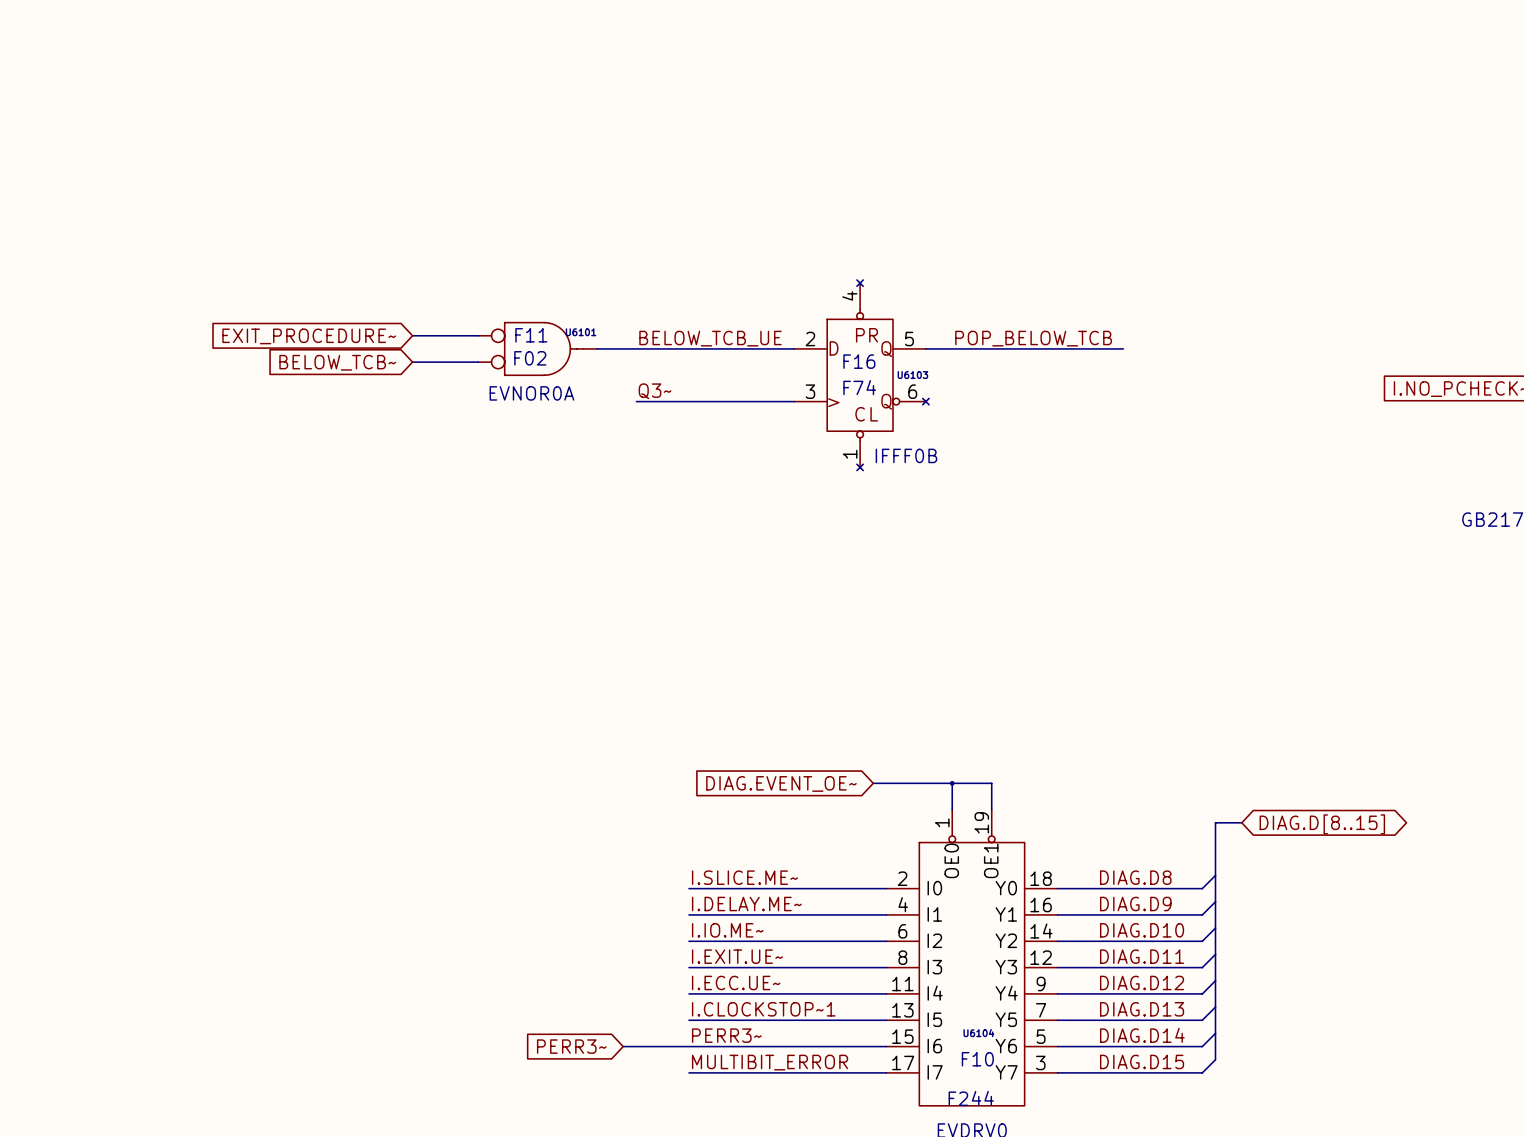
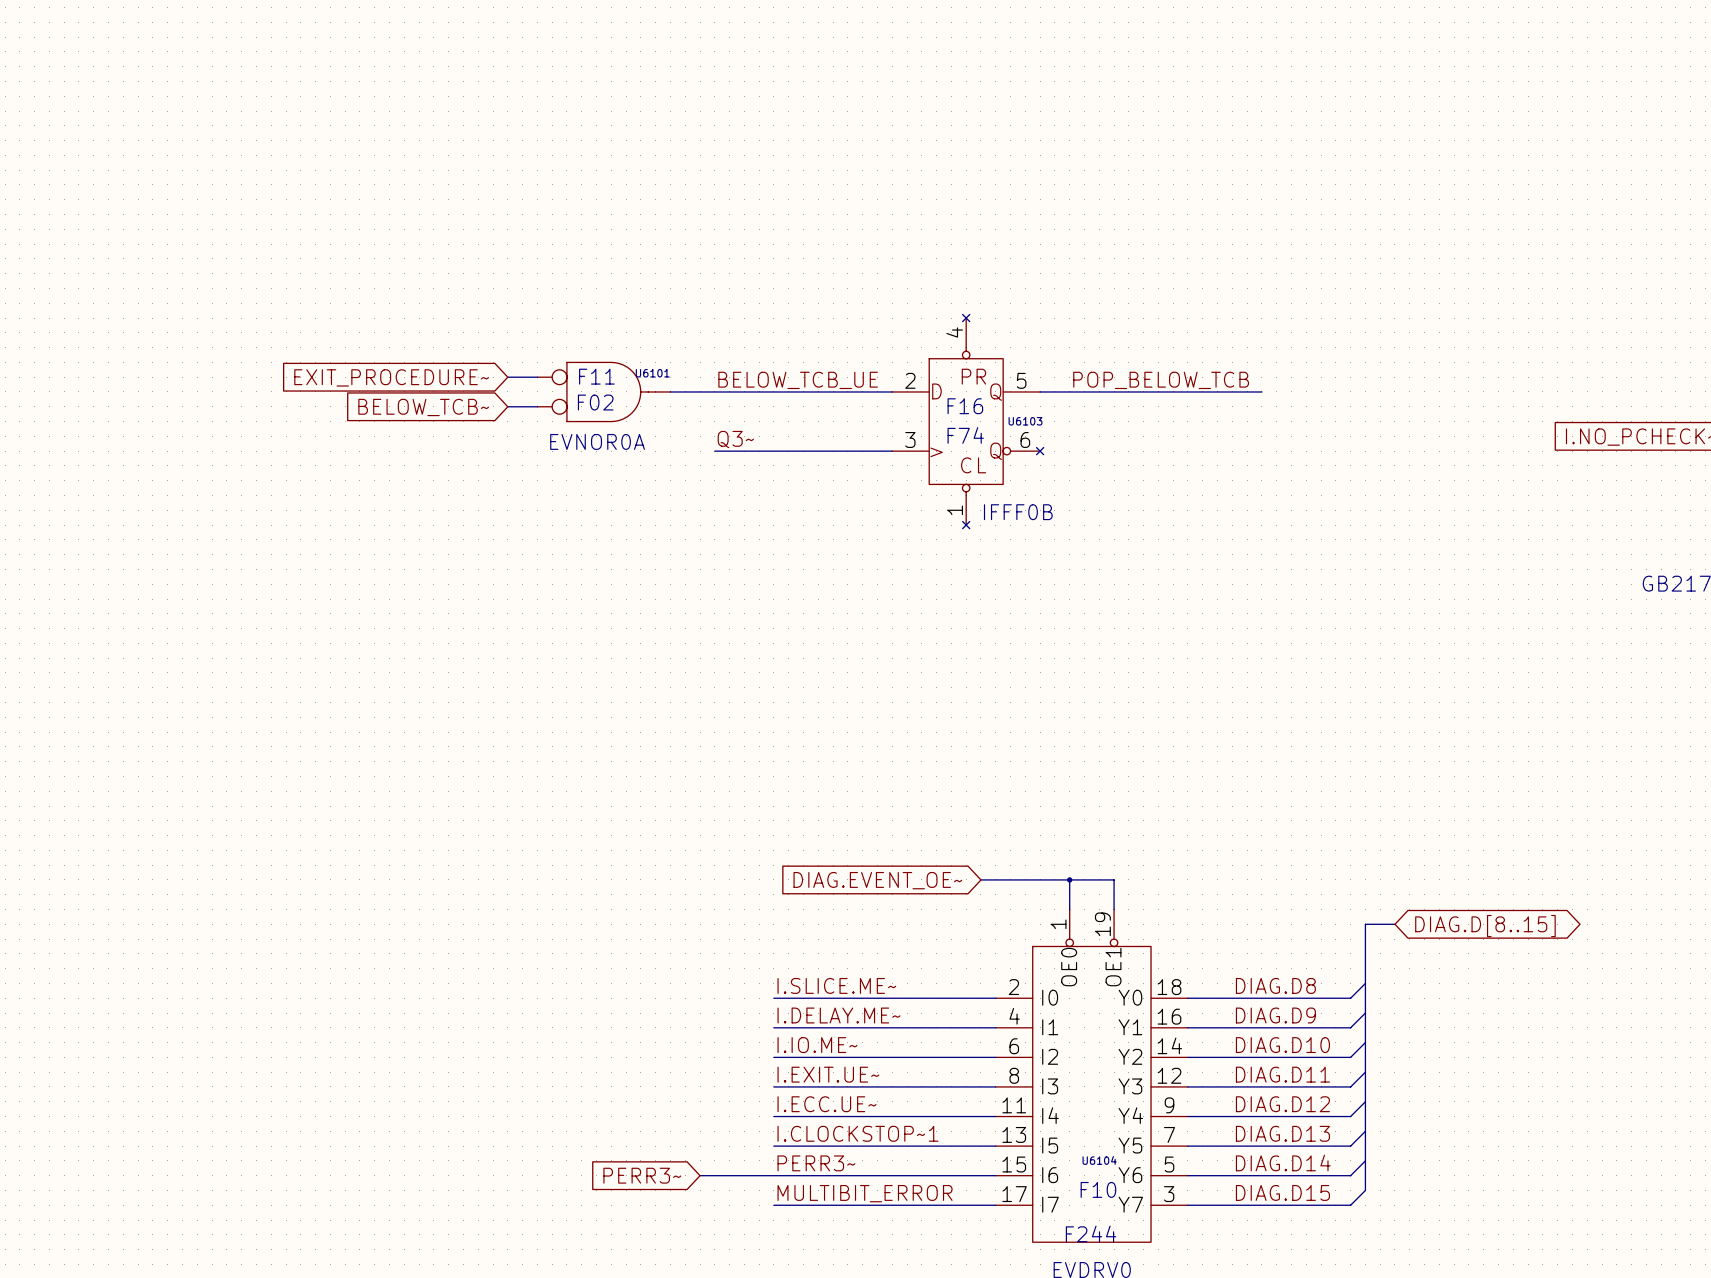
wire: (412, 335) (452, 335) -> none
global label position: EXIT_PROCEDURE~ (309, 336) -> EXIT_PROCEDURE~ (391, 377)
global label position: BELOW_TCB~ (337, 362) -> BELOW_TCB~ (423, 407)
wire: (412, 362) (452, 362) -> none

